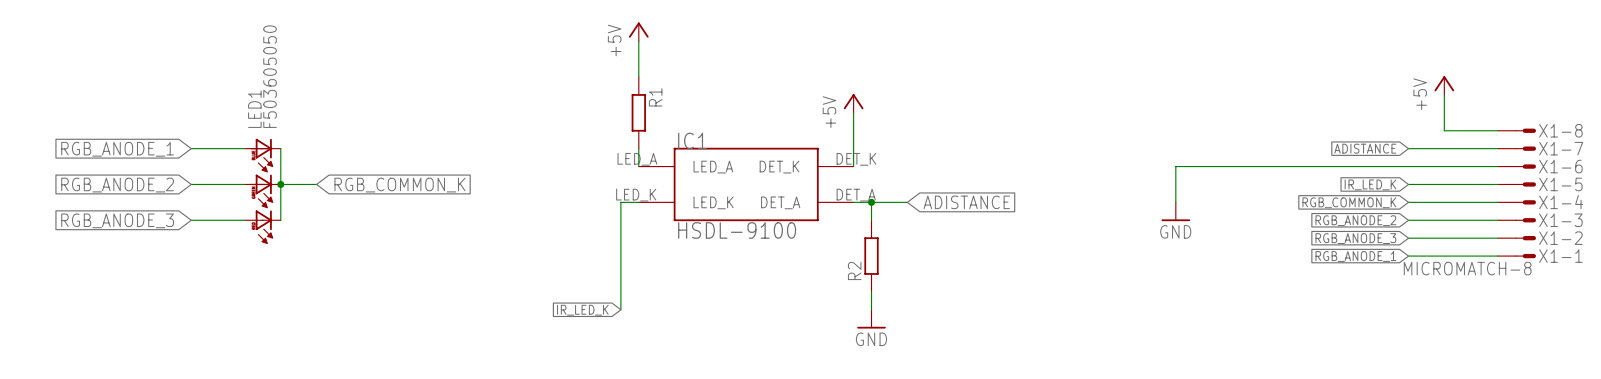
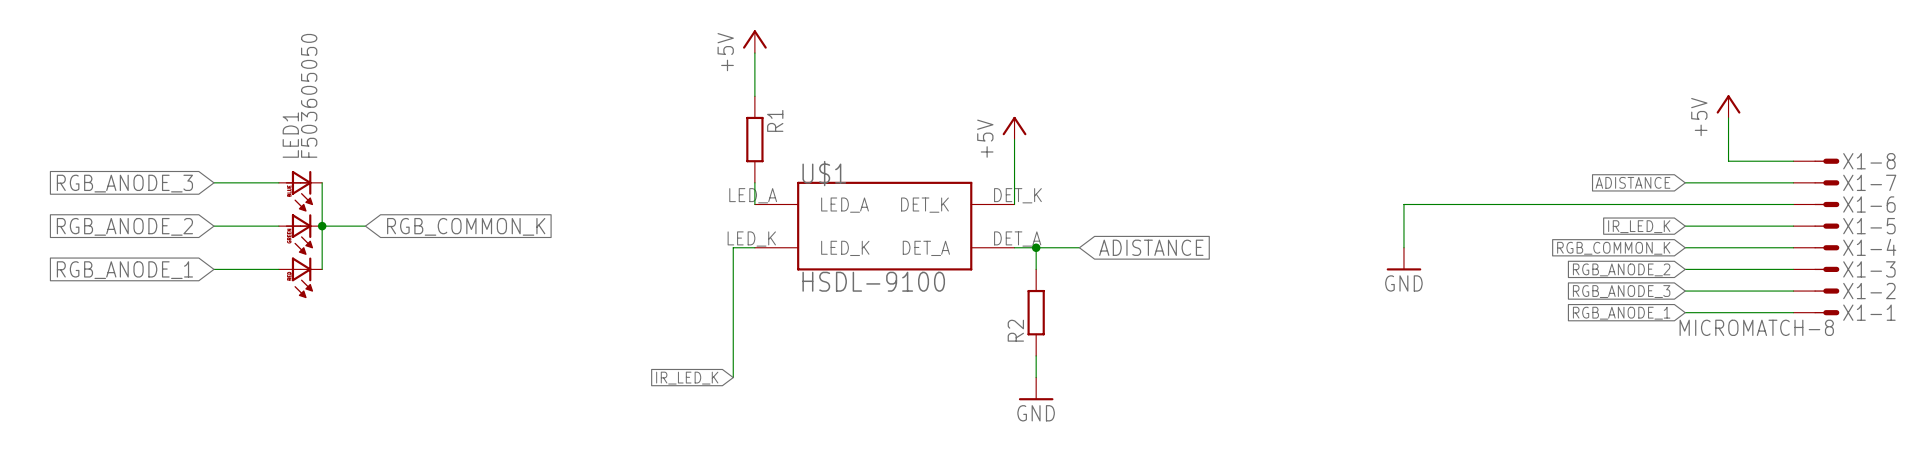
IC1 name: IC1 (692, 140) -> U$1 (824, 173)
global label: RGB_ANODE_1 (117, 149) -> RGB_ANODE_3 (124, 183)
global label: RGB_ANODE_3 (117, 220) -> RGB_ANODE_1 (124, 270)

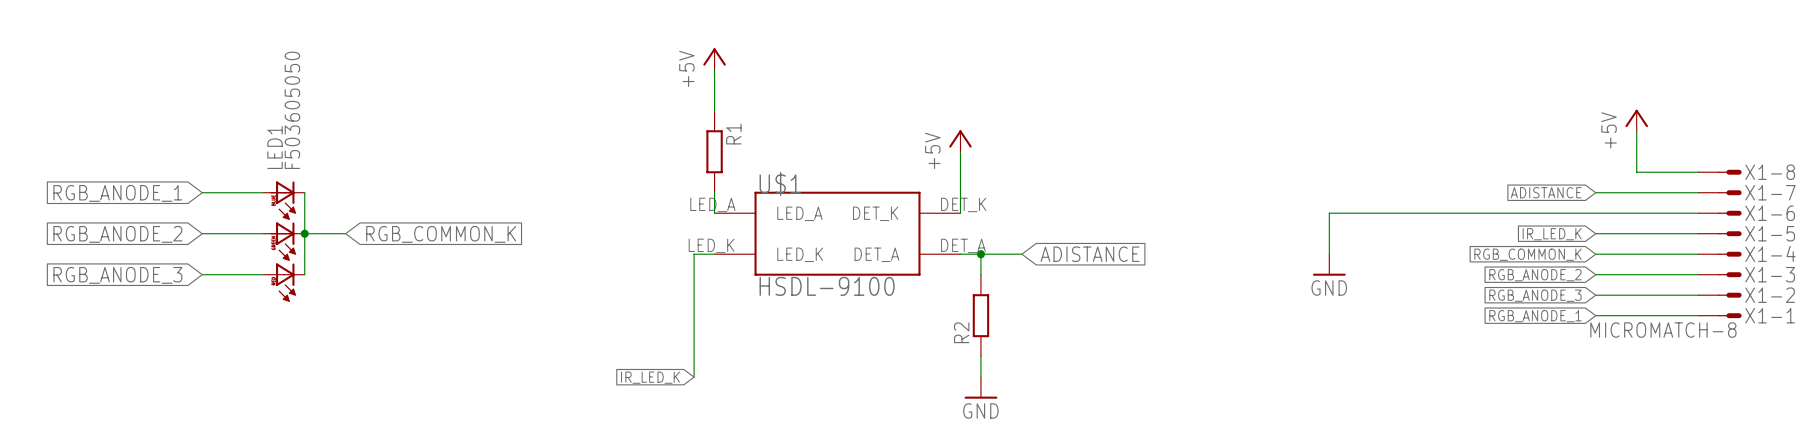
global label: RGB_ANODE_3 (124, 183) -> RGB_ANODE_1 (117, 193)
global label: RGB_ANODE_1 (124, 270) -> RGB_ANODE_3 (117, 275)

